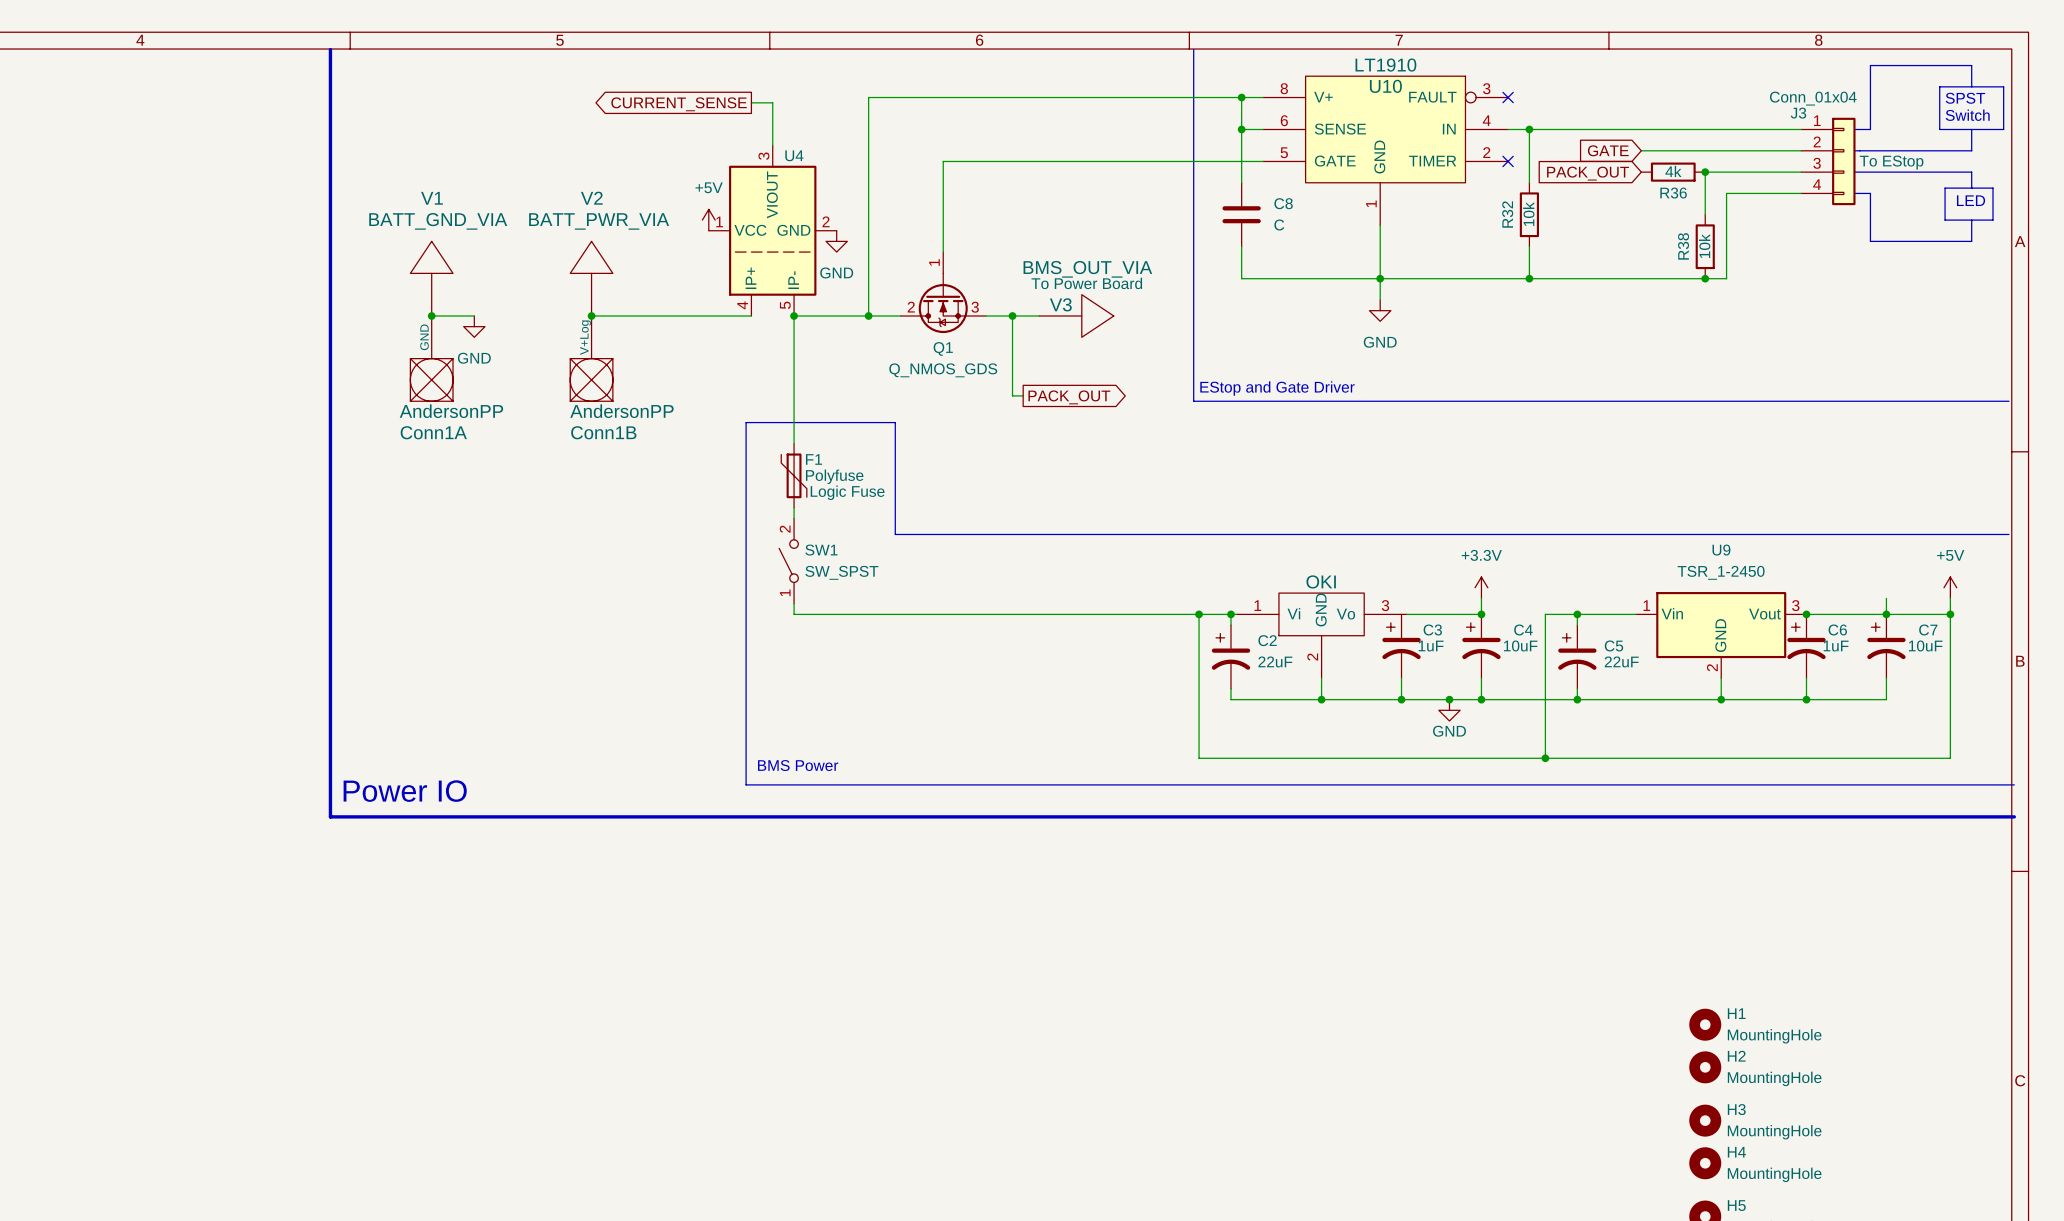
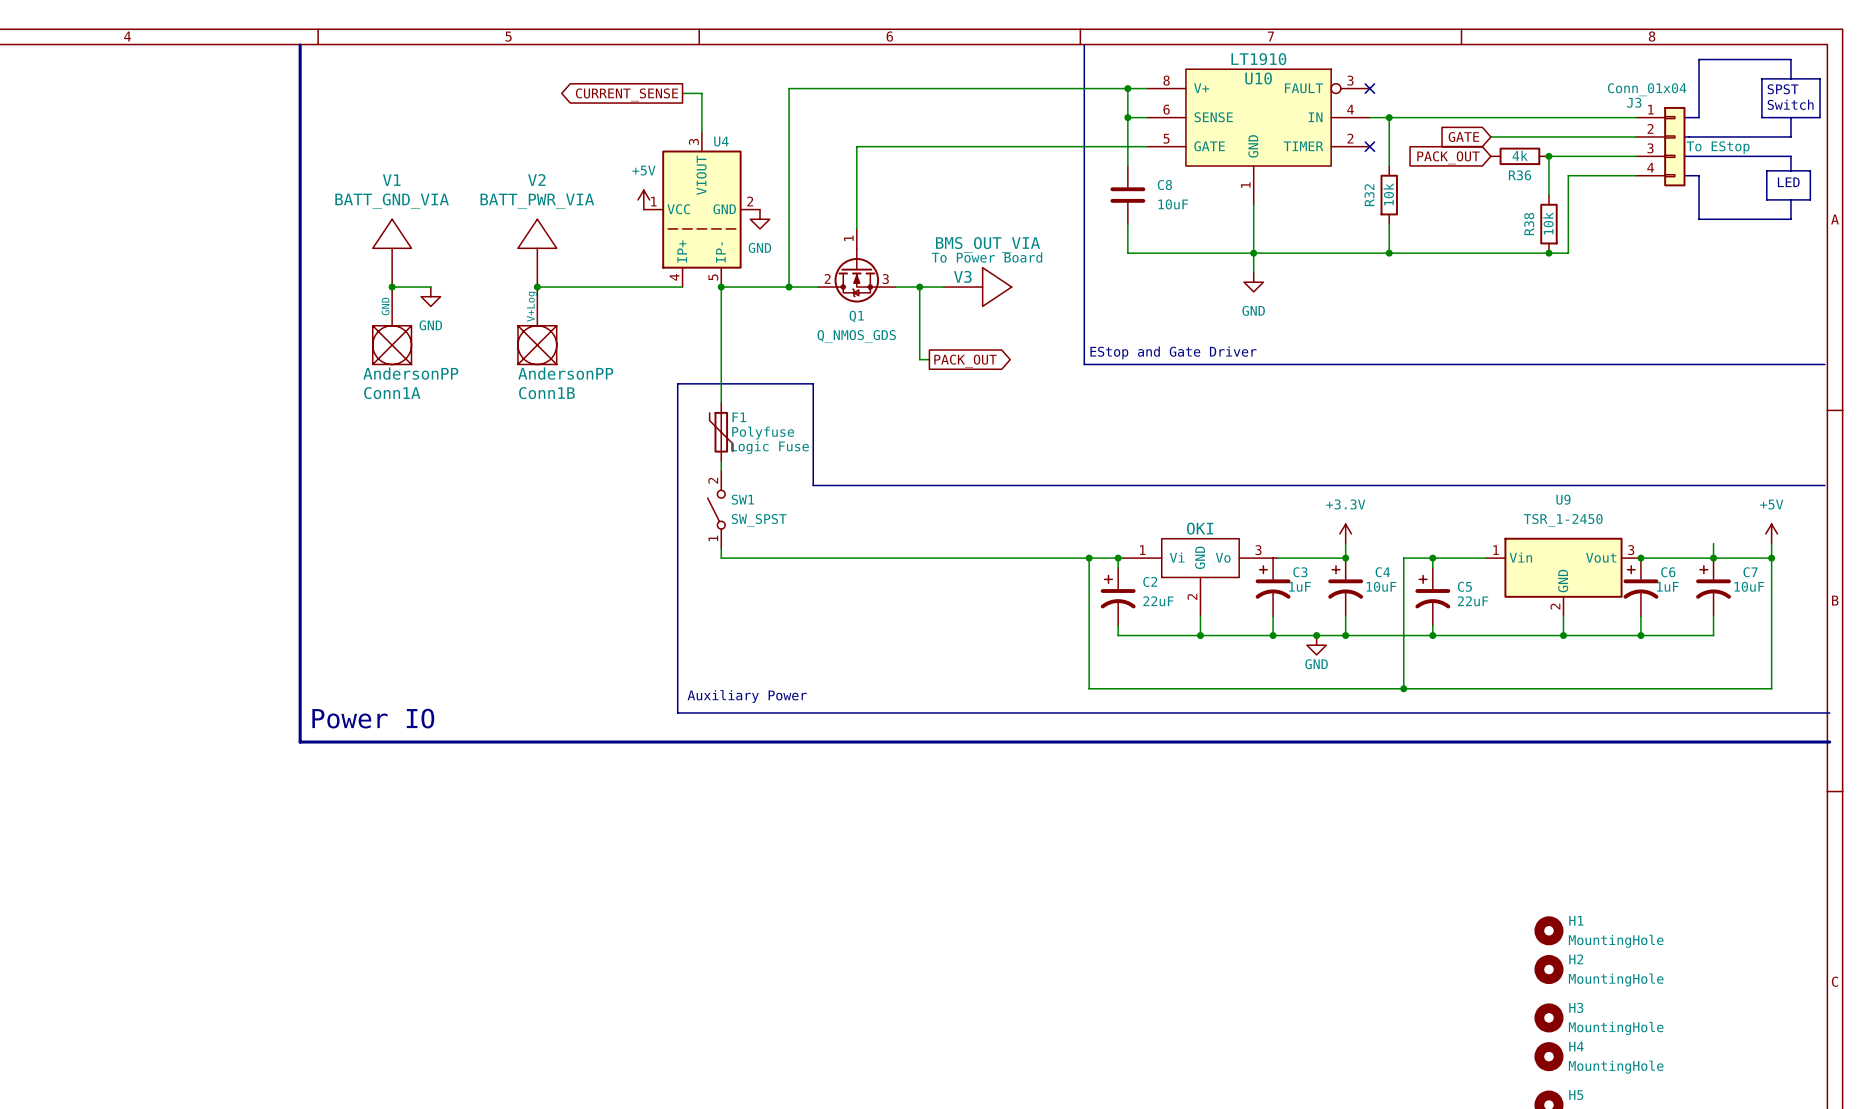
C8 value: C (1279, 225) -> 10uF (1173, 204)
text: BMS Power (798, 765) -> Auxiliary Power (747, 696)

